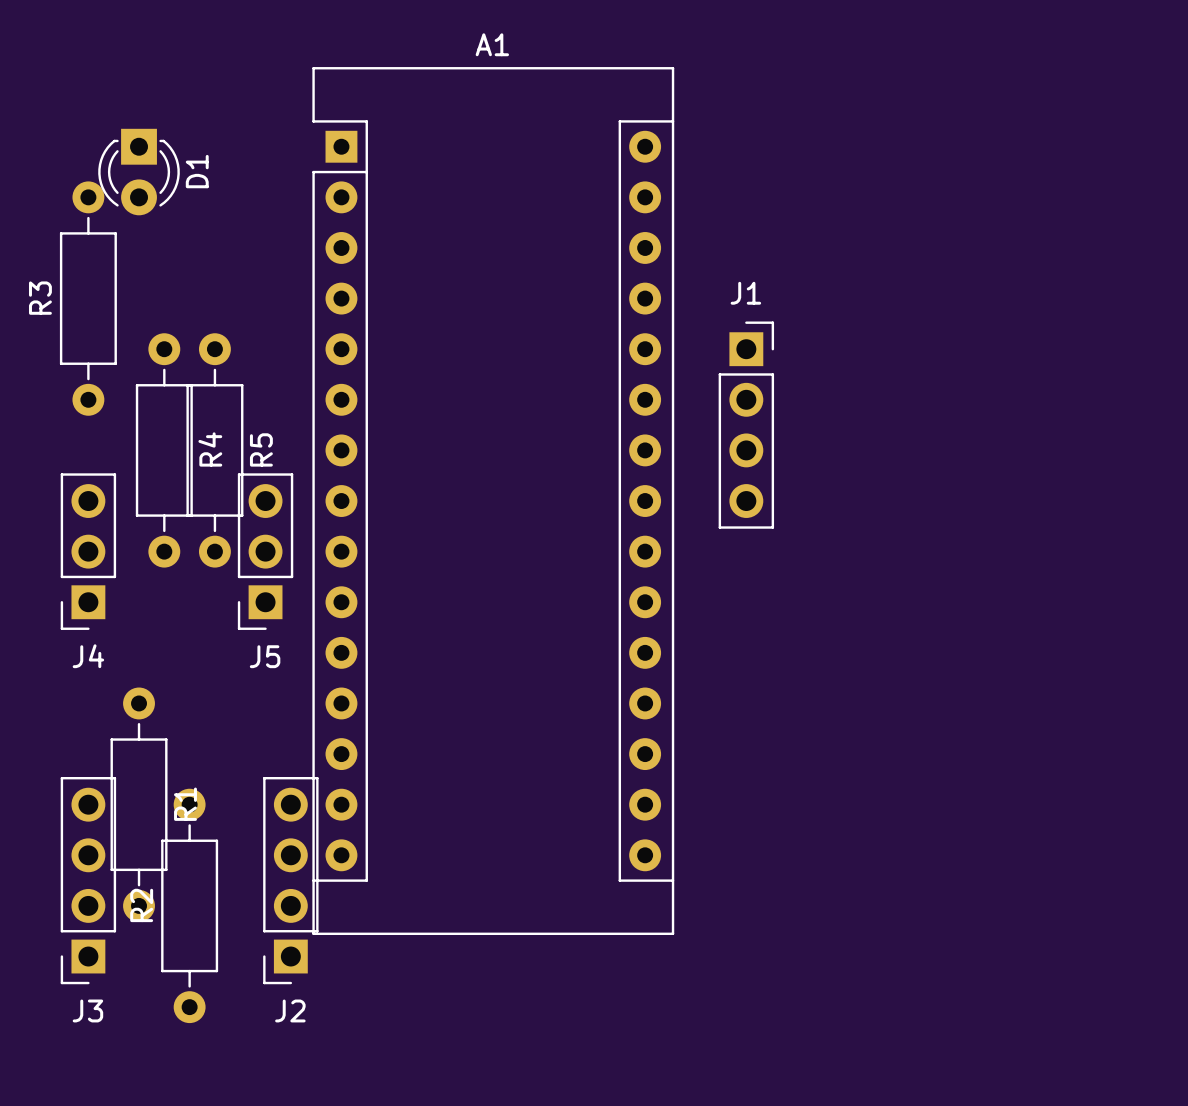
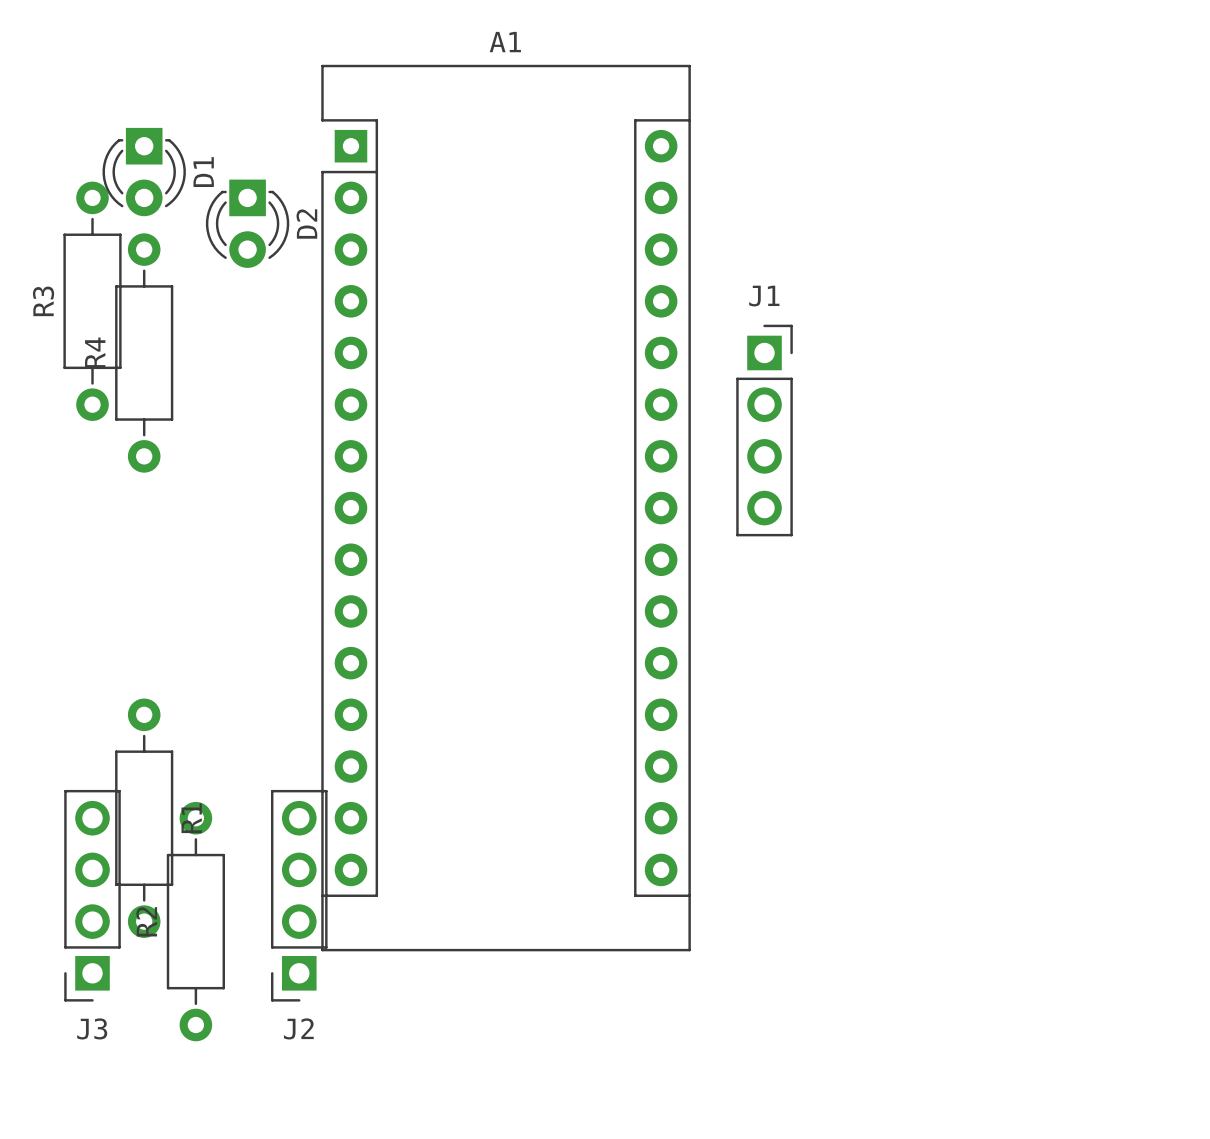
D2: none -> (247, 223)
R4 name position: R4 (210, 449) -> R4 (95, 352)
R4 position: (164, 450) -> (144, 352)
R5: (214, 450) -> none
J4: (88, 551) -> none
J5: (265, 551) -> none

